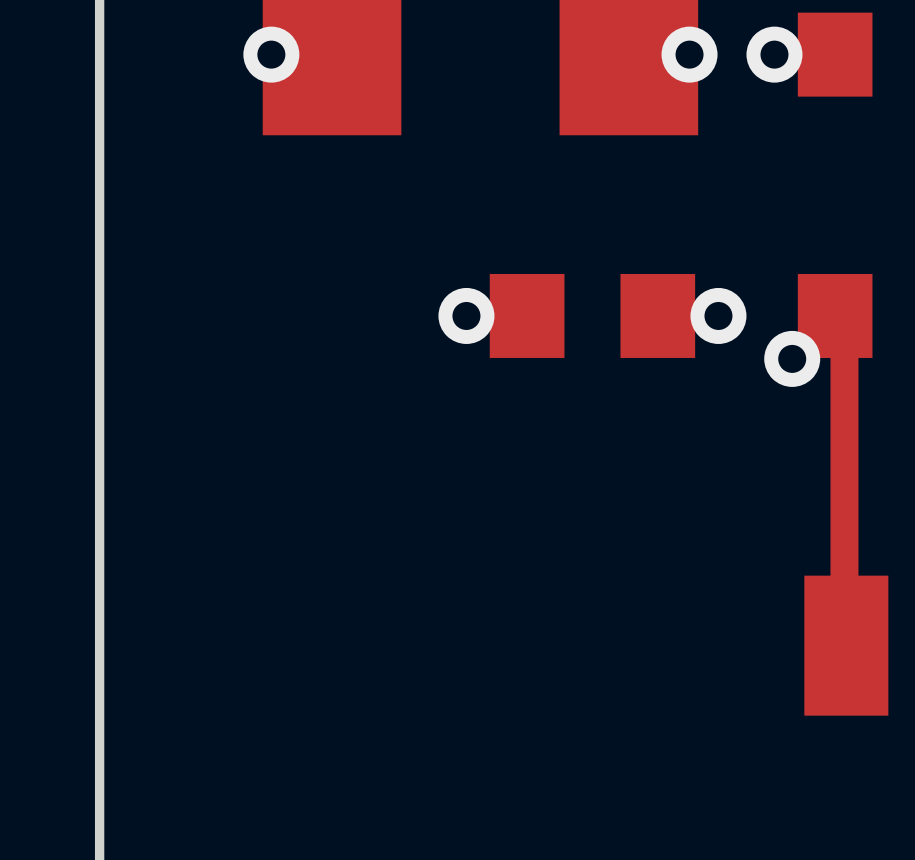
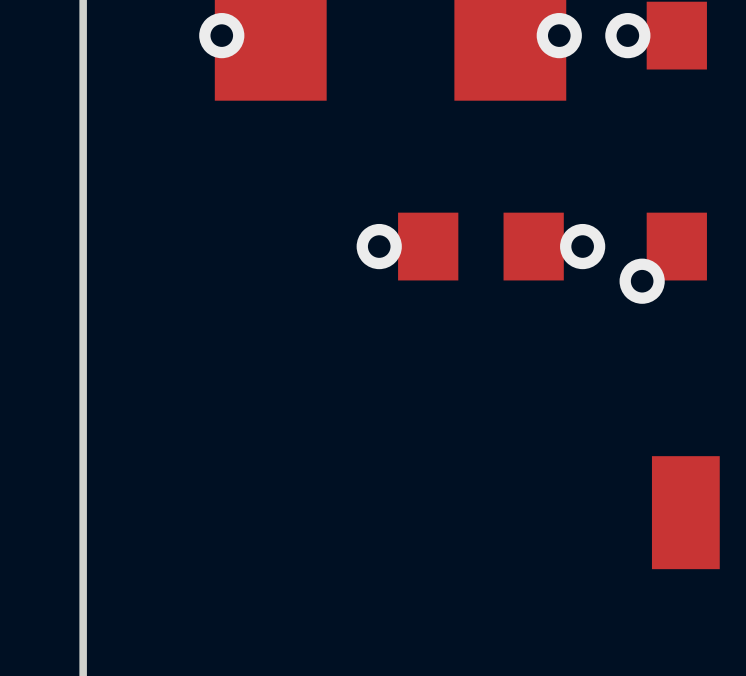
top track: (835, 315) (844, 325) (844, 647) (846, 645) -> none

